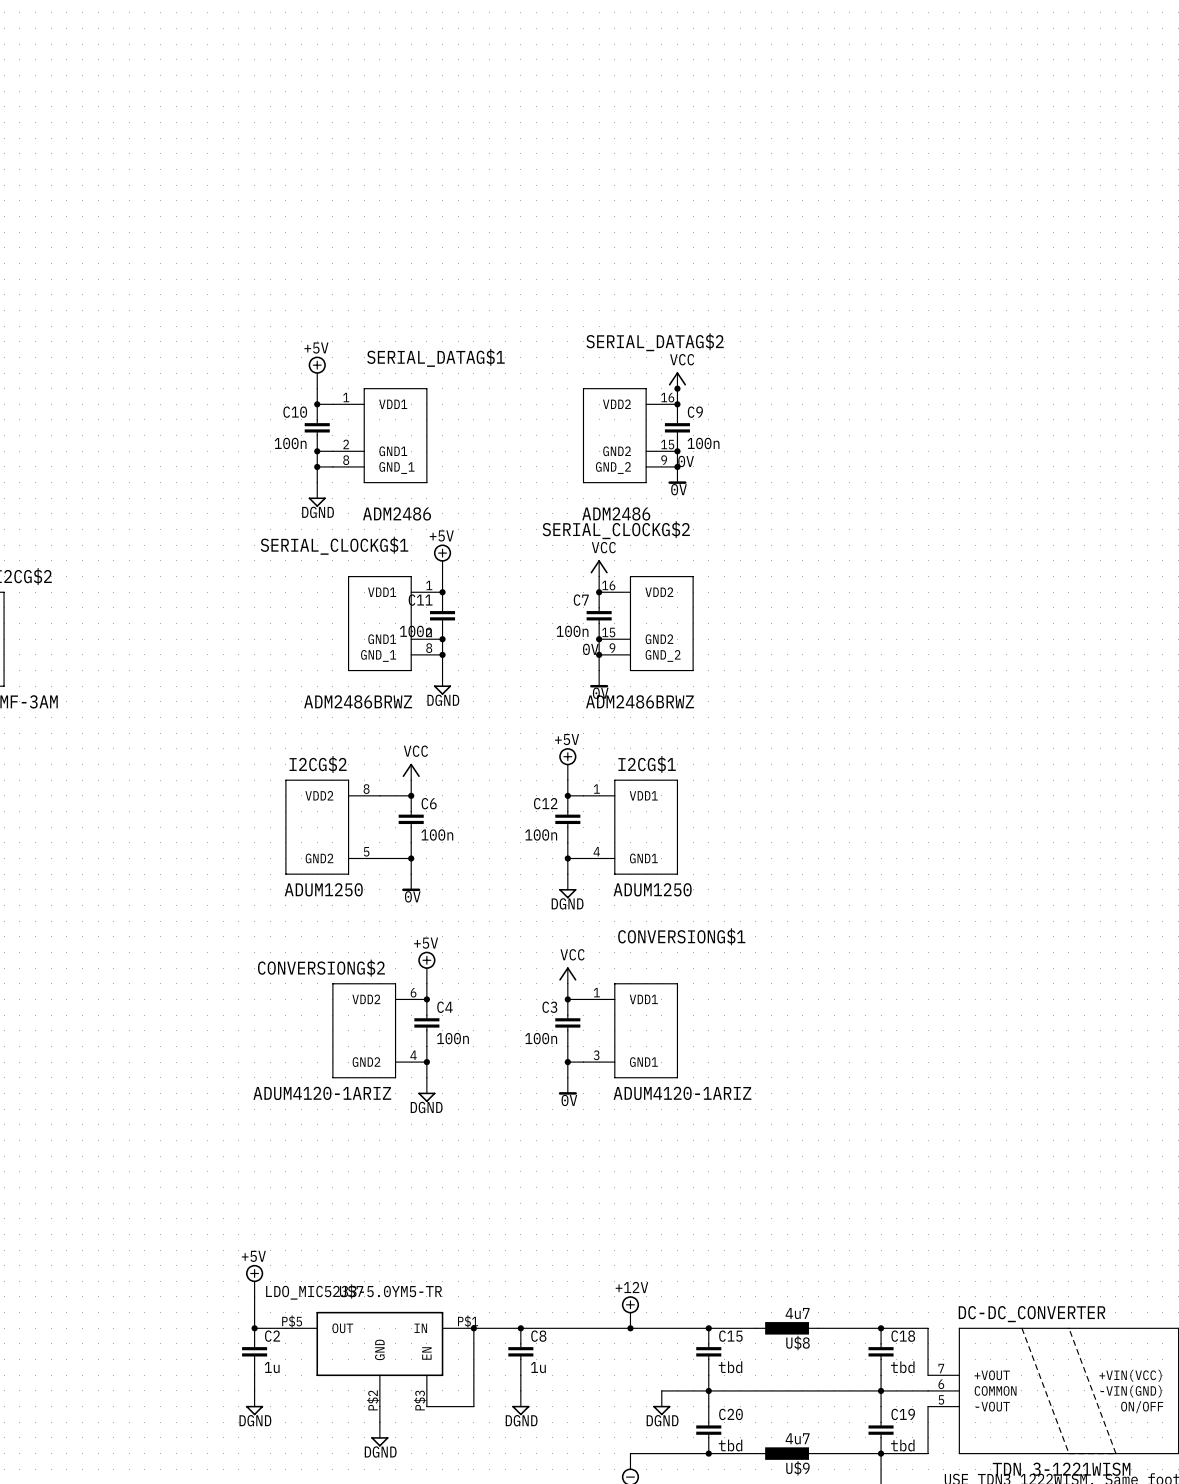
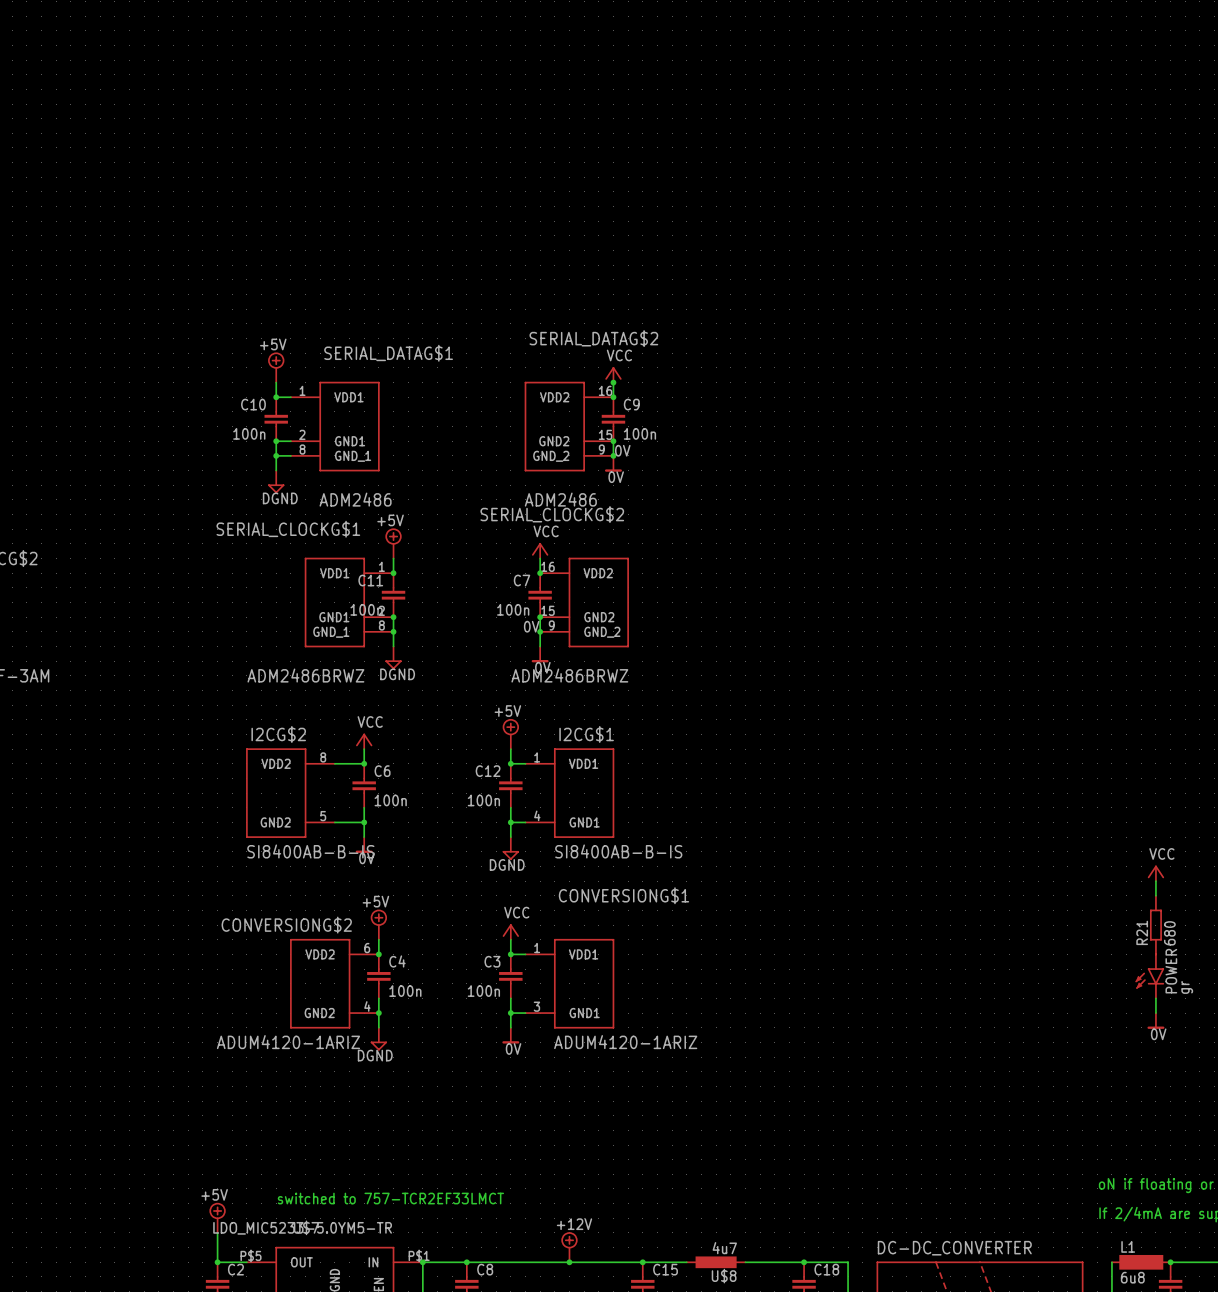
I2CG$2 value: ADUM1250 (323, 889) -> SI8400AB-B-IS (310, 851)
I2CG$1 value: ADUM1250 (652, 889) -> SI8400AB-B-IS (618, 851)
text: none -> switched to 757-TCR2EF33LMCT (390, 1198)

